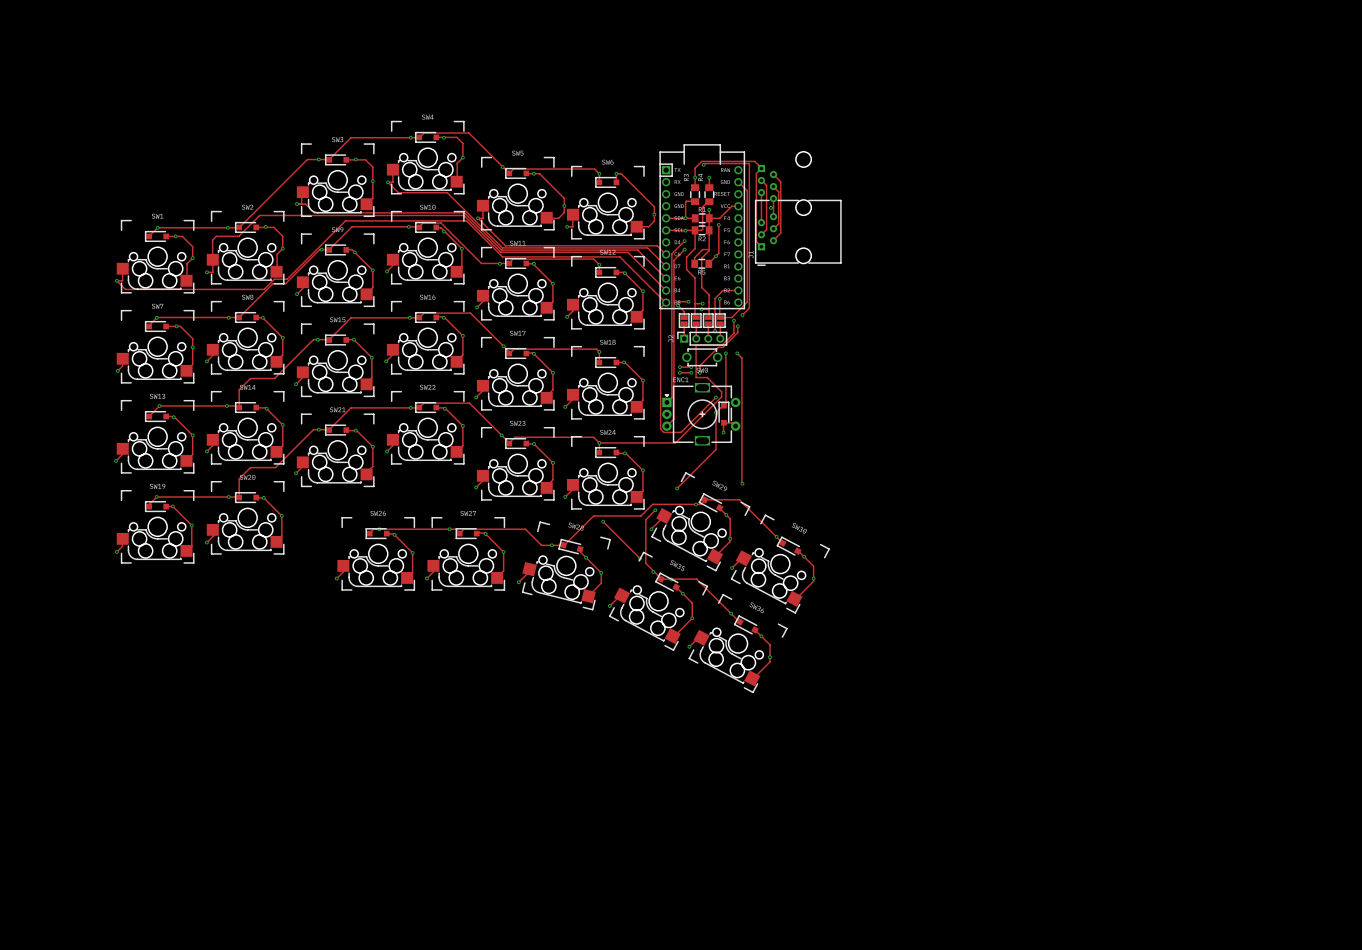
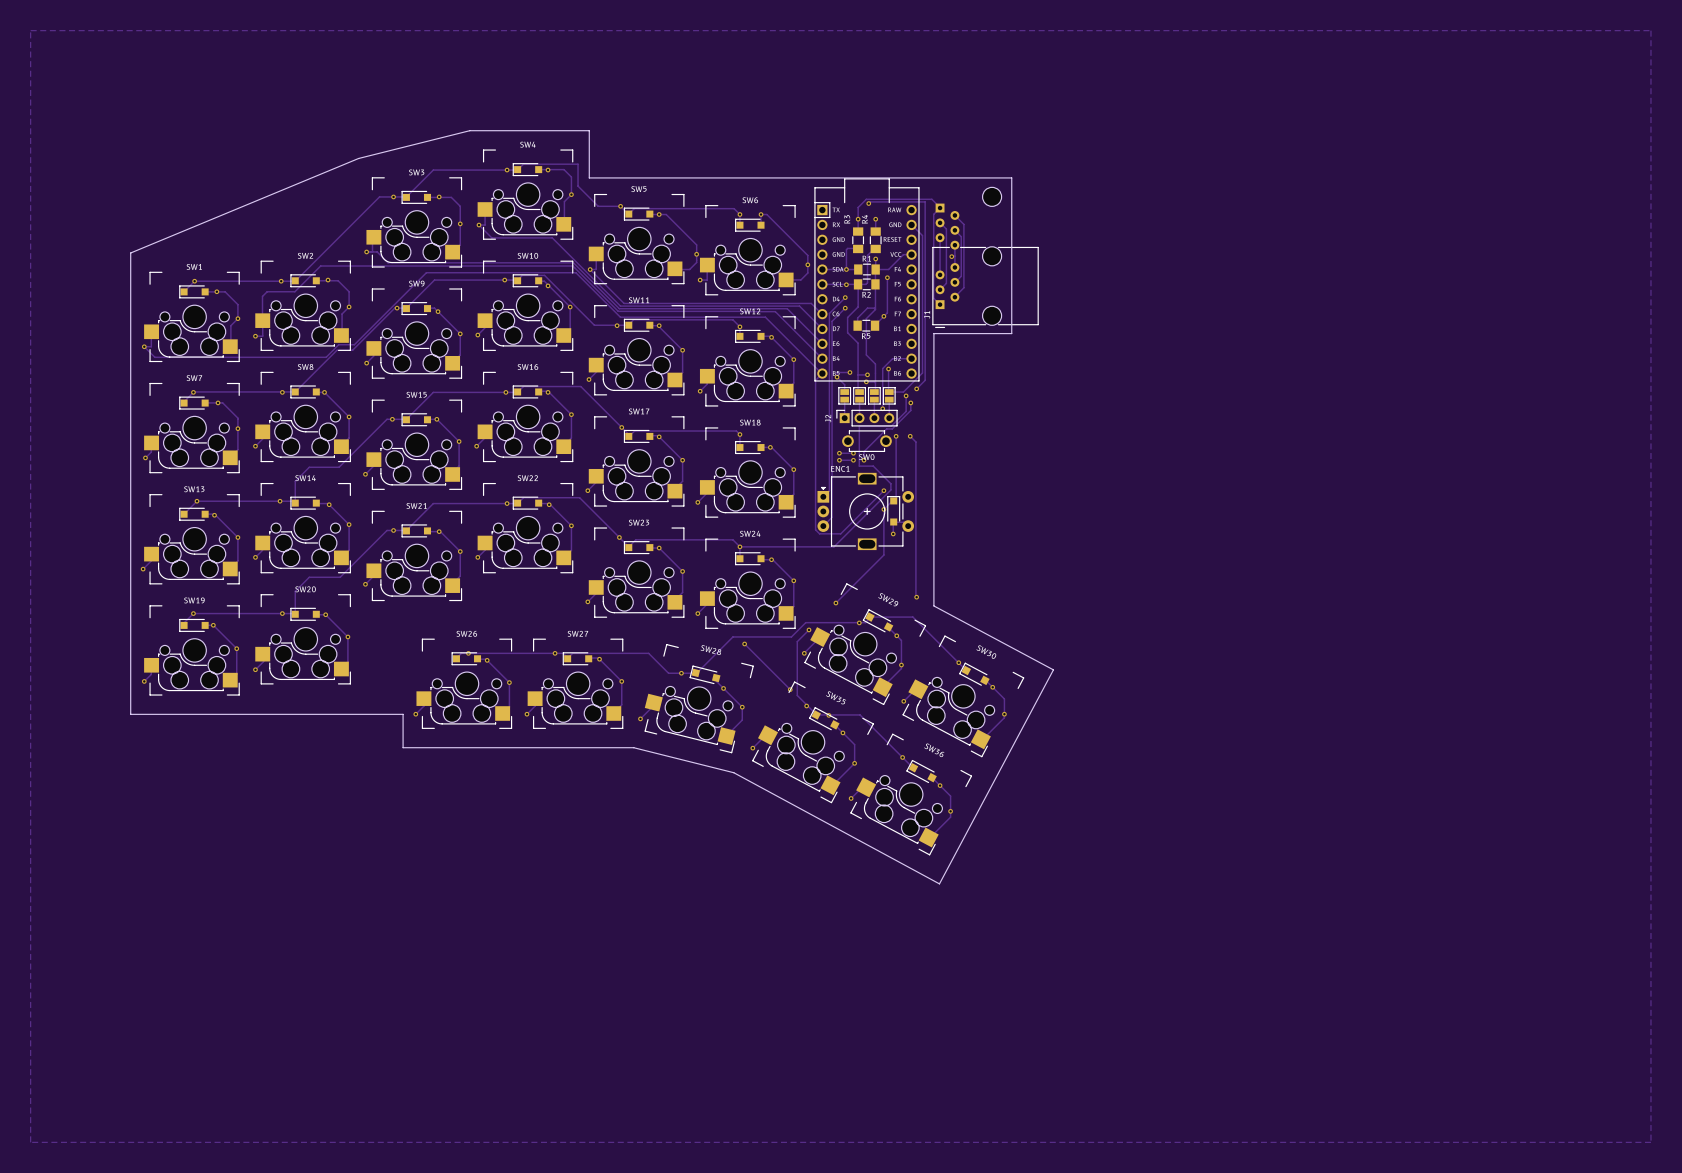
zone outline: none -> (30, 30) (30, 1142) (1650, 1142) (1650, 30) (30, 30)
board edge: none -> (469, 130) (589, 130) (589, 177) (1011, 177) (1011, 333) (933, 333) (933, 605) (1053, 669) (939, 883) (733, 772) (633, 747) (403, 747) (403, 714) (130, 714) (130, 252) (358, 158) (469, 130)
track: (468, 133) (509, 173) -> (578, 164) (578, 186) (598, 206) (620, 206) (628, 213)

